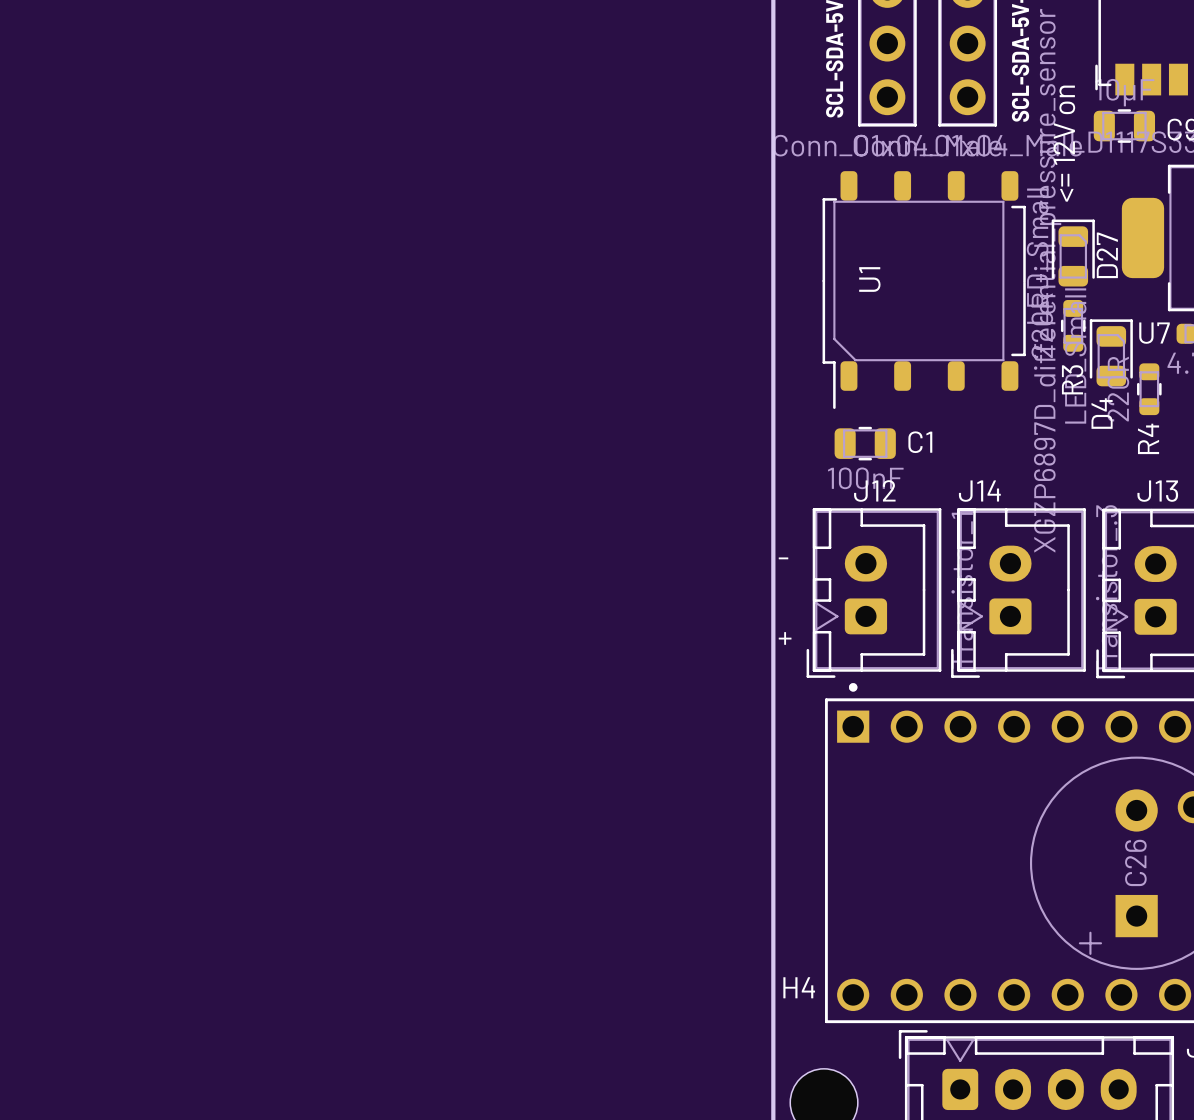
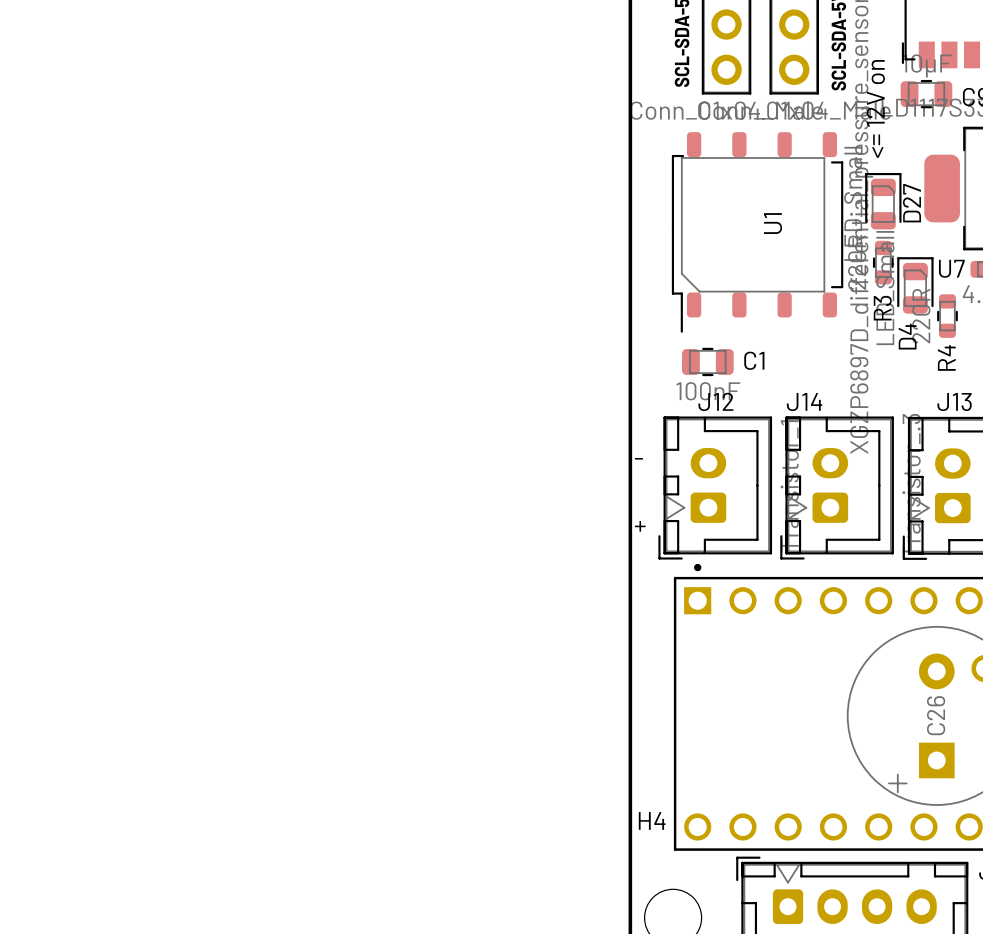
U1 name position: U1 (869, 279) -> U1 (773, 223)

